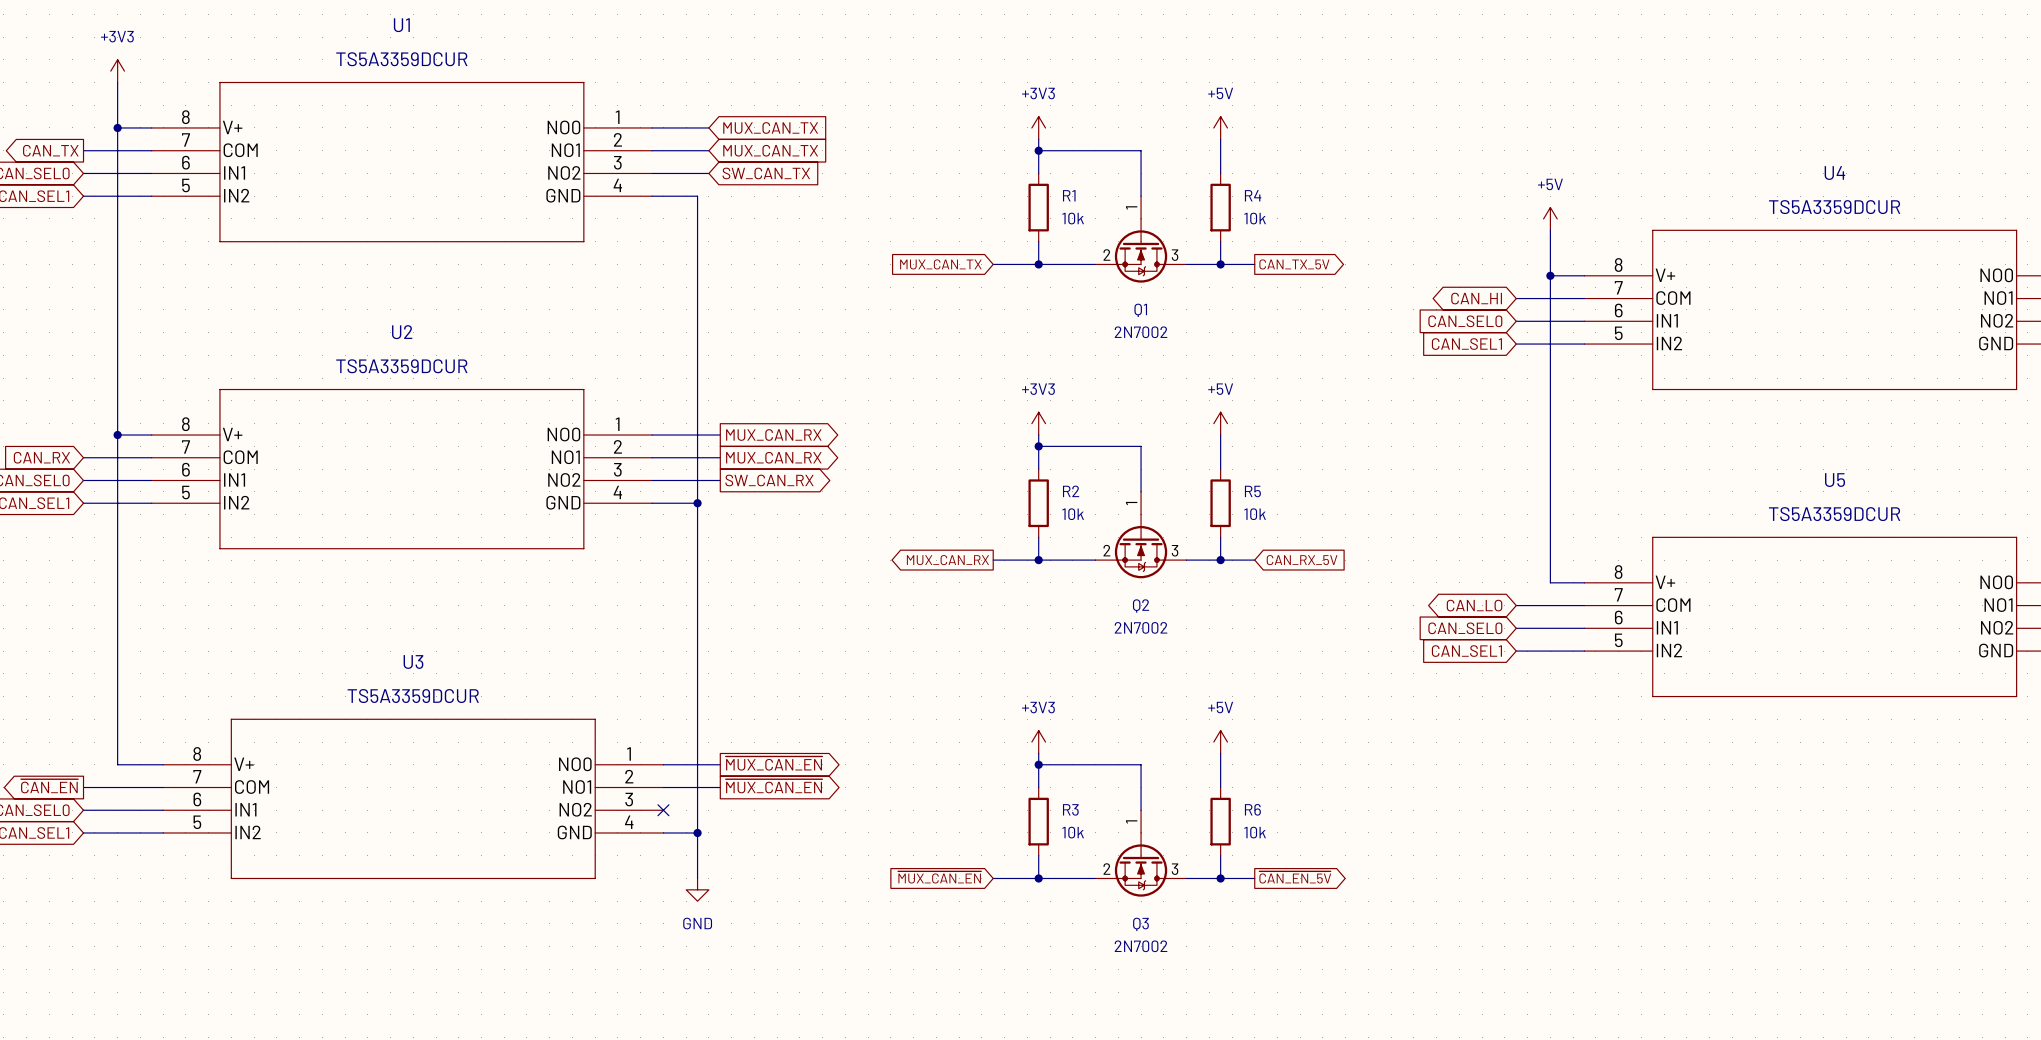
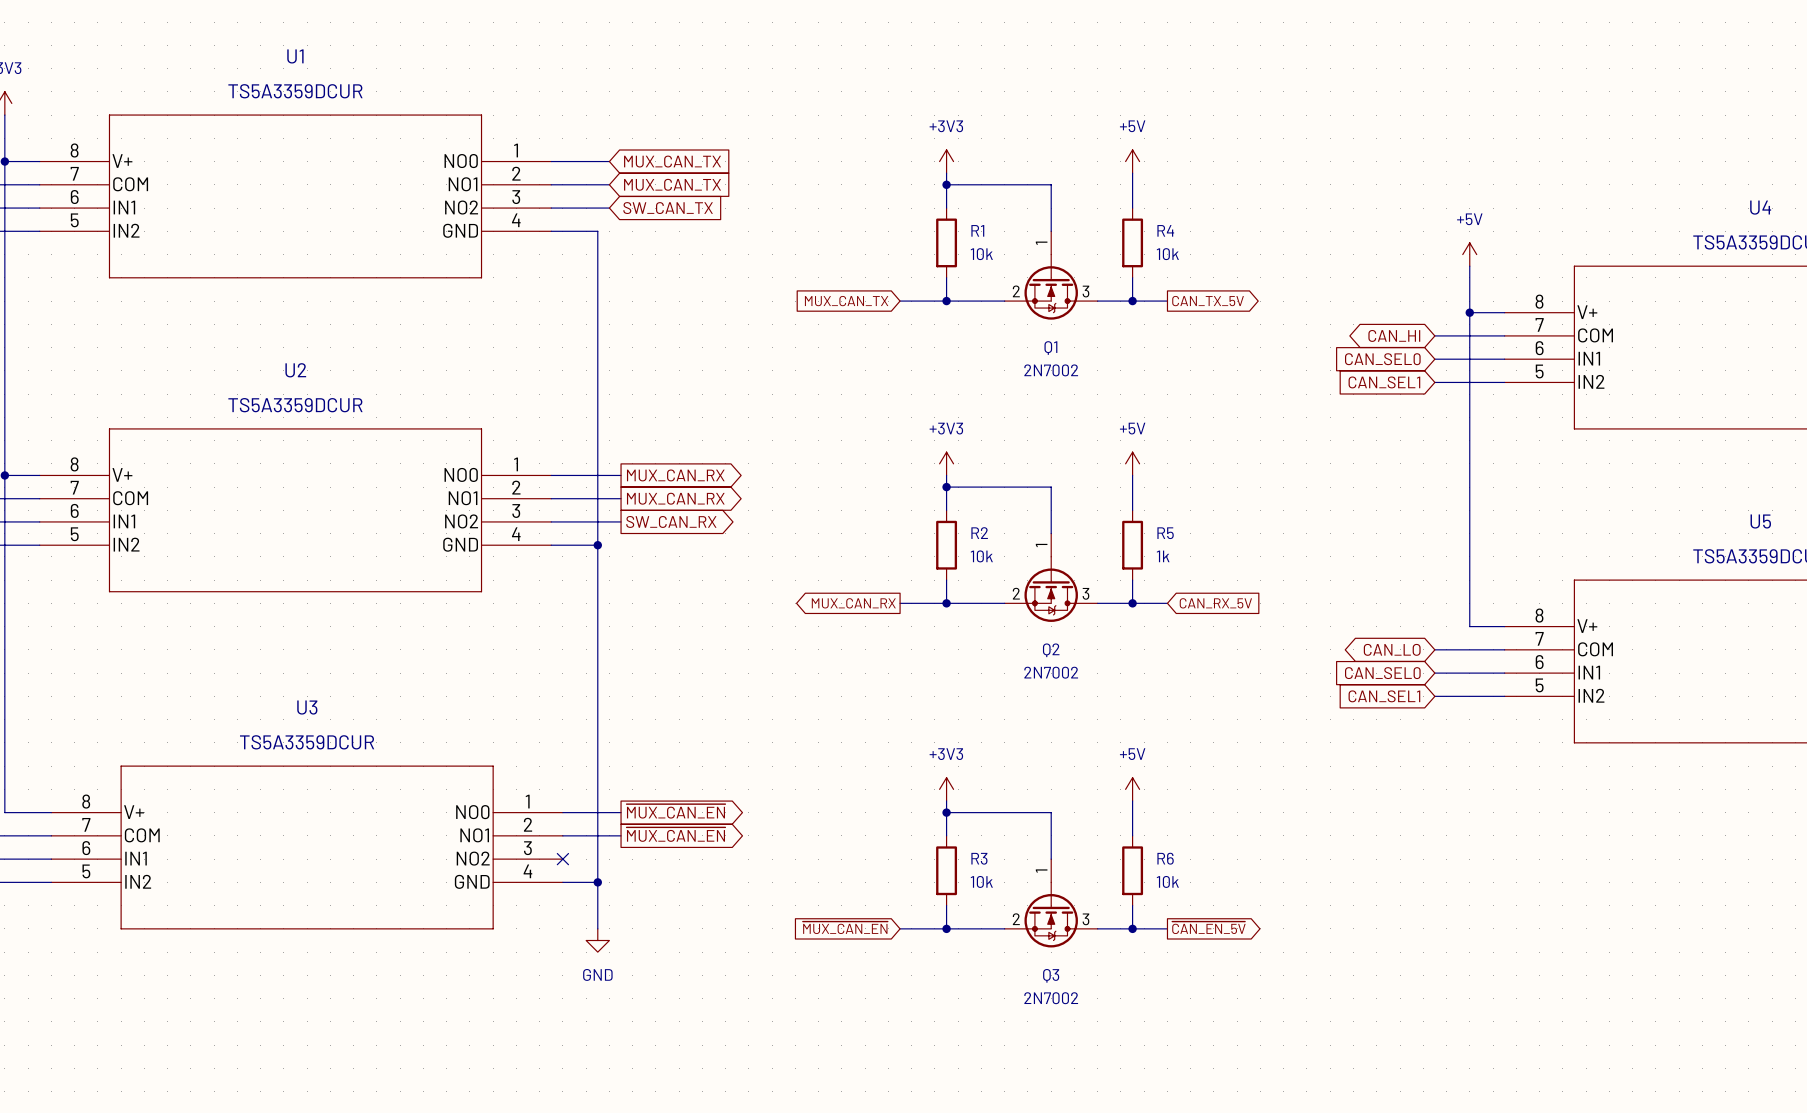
R5 value: 10k (1255, 514) -> 1k (1163, 556)

